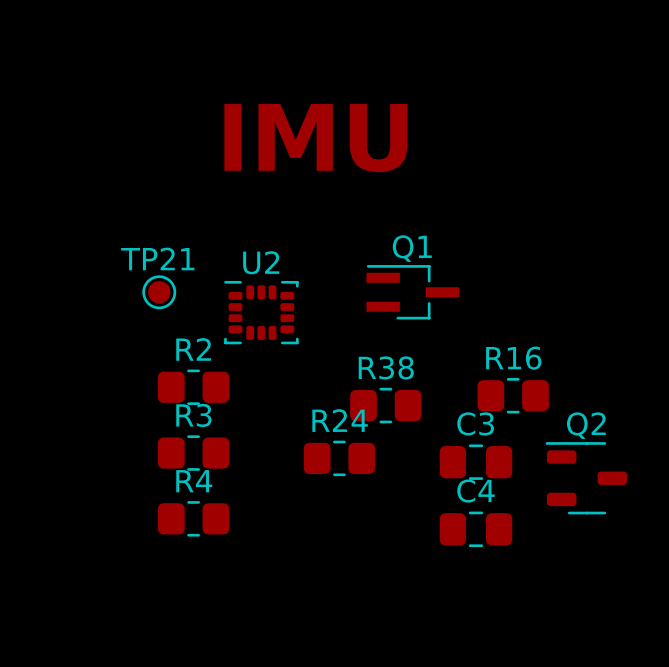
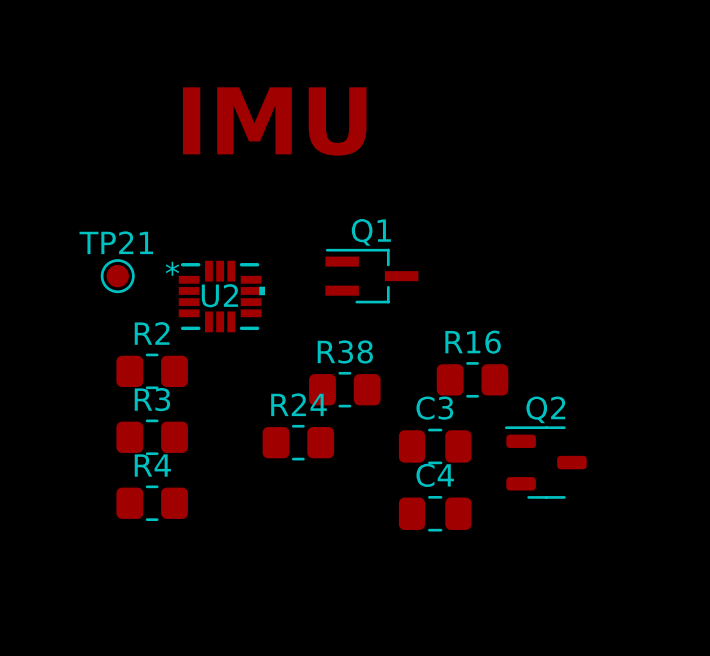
U2 name position: U2 (261, 262) -> U2 (219, 295)
U2 footprint: [224, 280, 299, 345] -> [178, 260, 265, 333]

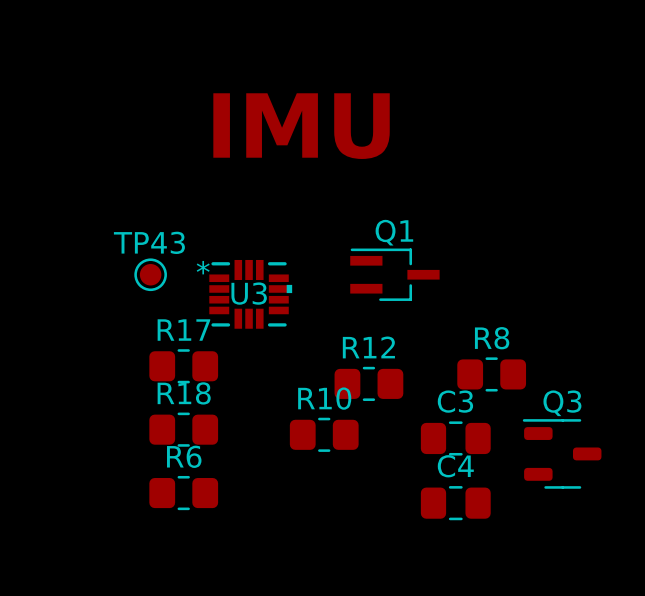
TP21 name: TP21 (116, 242) -> TP43 (149, 242)
U2 name: U2 (219, 295) -> U3 (249, 293)
R2 name: R2 (152, 333) -> R17 (183, 330)
R16 name: R16 (473, 342) -> R8 (492, 338)
R38 name: R38 (345, 351) -> R12 (368, 347)
R3 name: R3 (152, 399) -> R18 (184, 393)
R24 name: R24 (298, 404) -> R10 (324, 398)
Q2 name: Q2 (545, 409) -> Q3 (562, 403)
R4 name: R4 (152, 465) -> R6 (184, 456)

